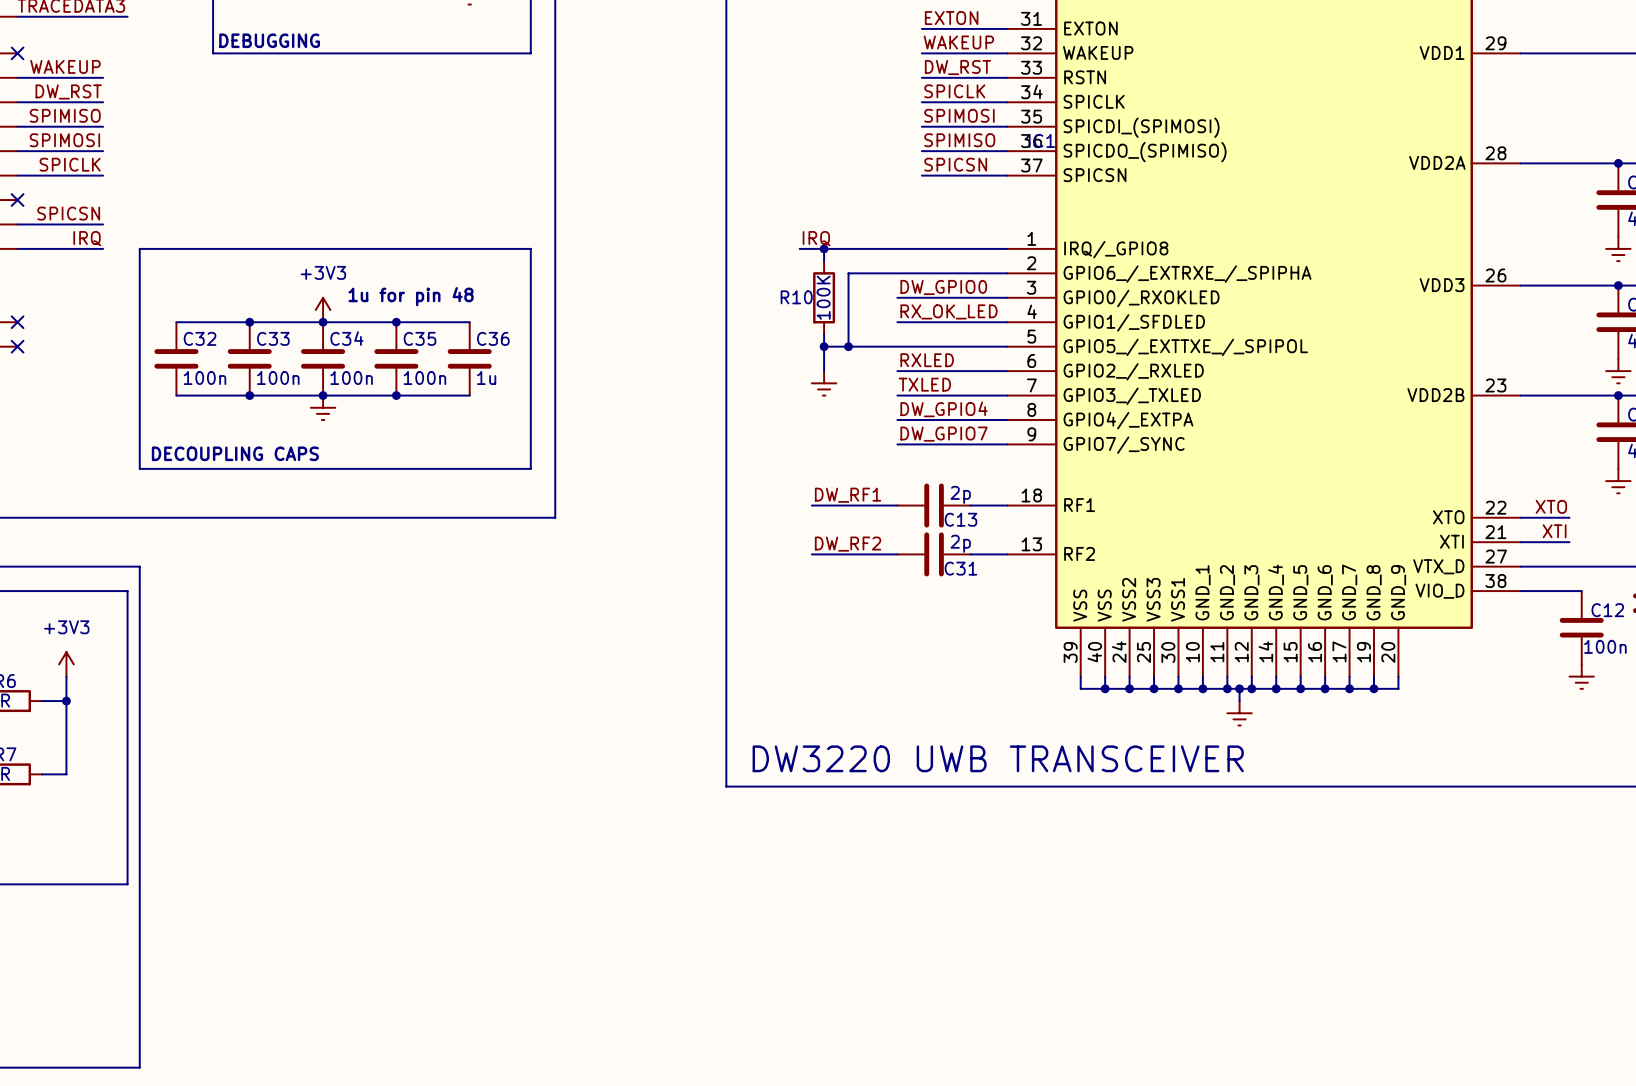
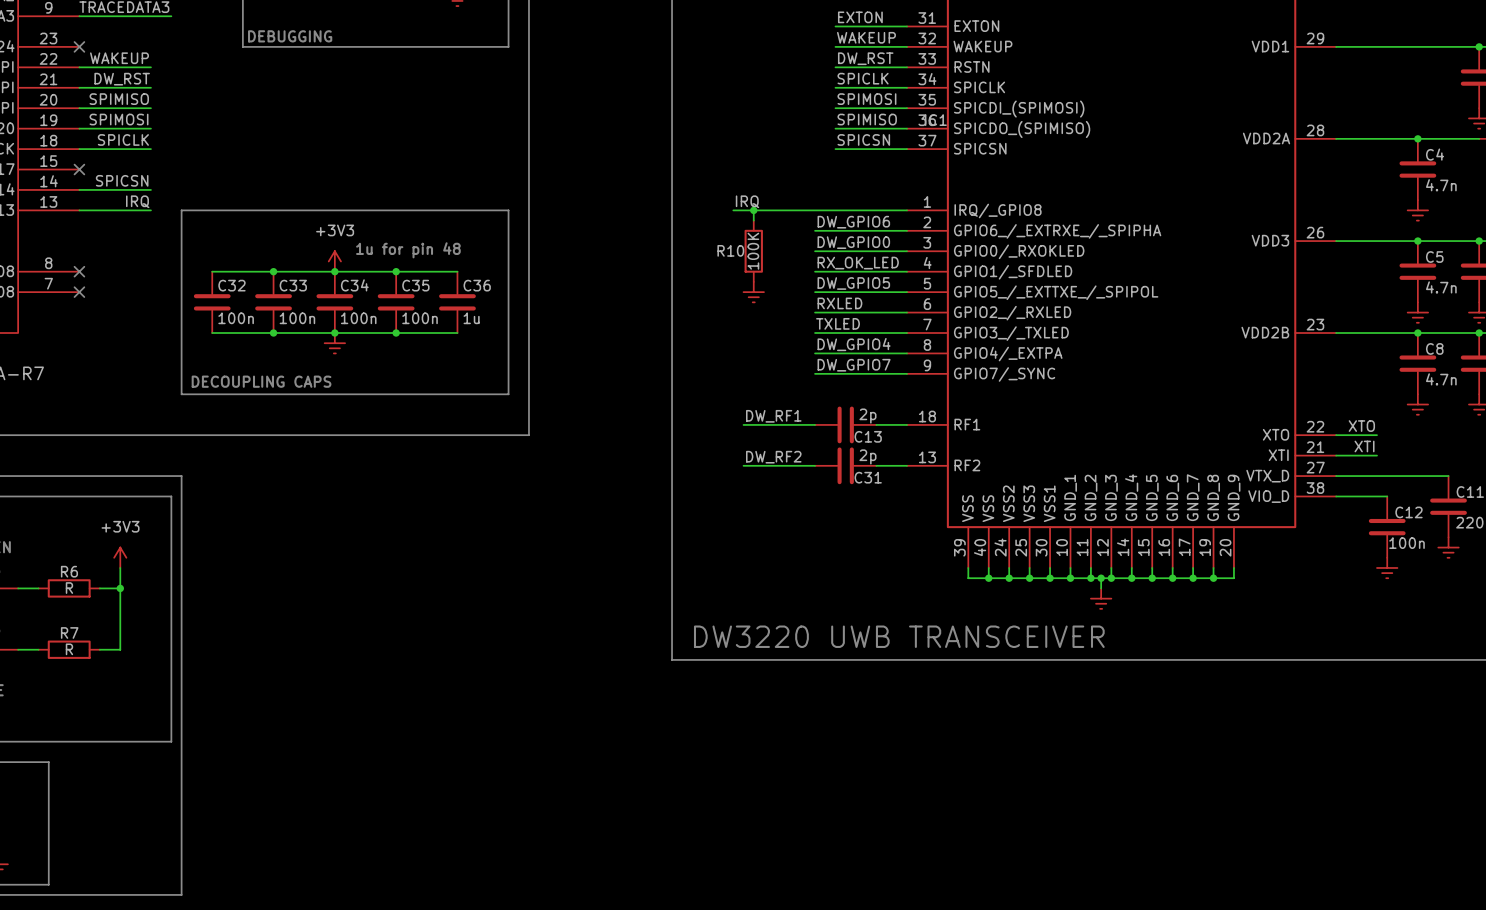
label: none -> DW_GPIO6 (853, 222)
wire: (897, 273) (848, 273) (848, 346) -> none
wire: (824, 334) (824, 371) -> none
label: none -> DW_GPIO5 (853, 283)
wire: (824, 346) (897, 346) -> none
junction: (824, 346) -> none
junction: (848, 346) -> none
power symbol position: (824, 383) -> (753, 292)

